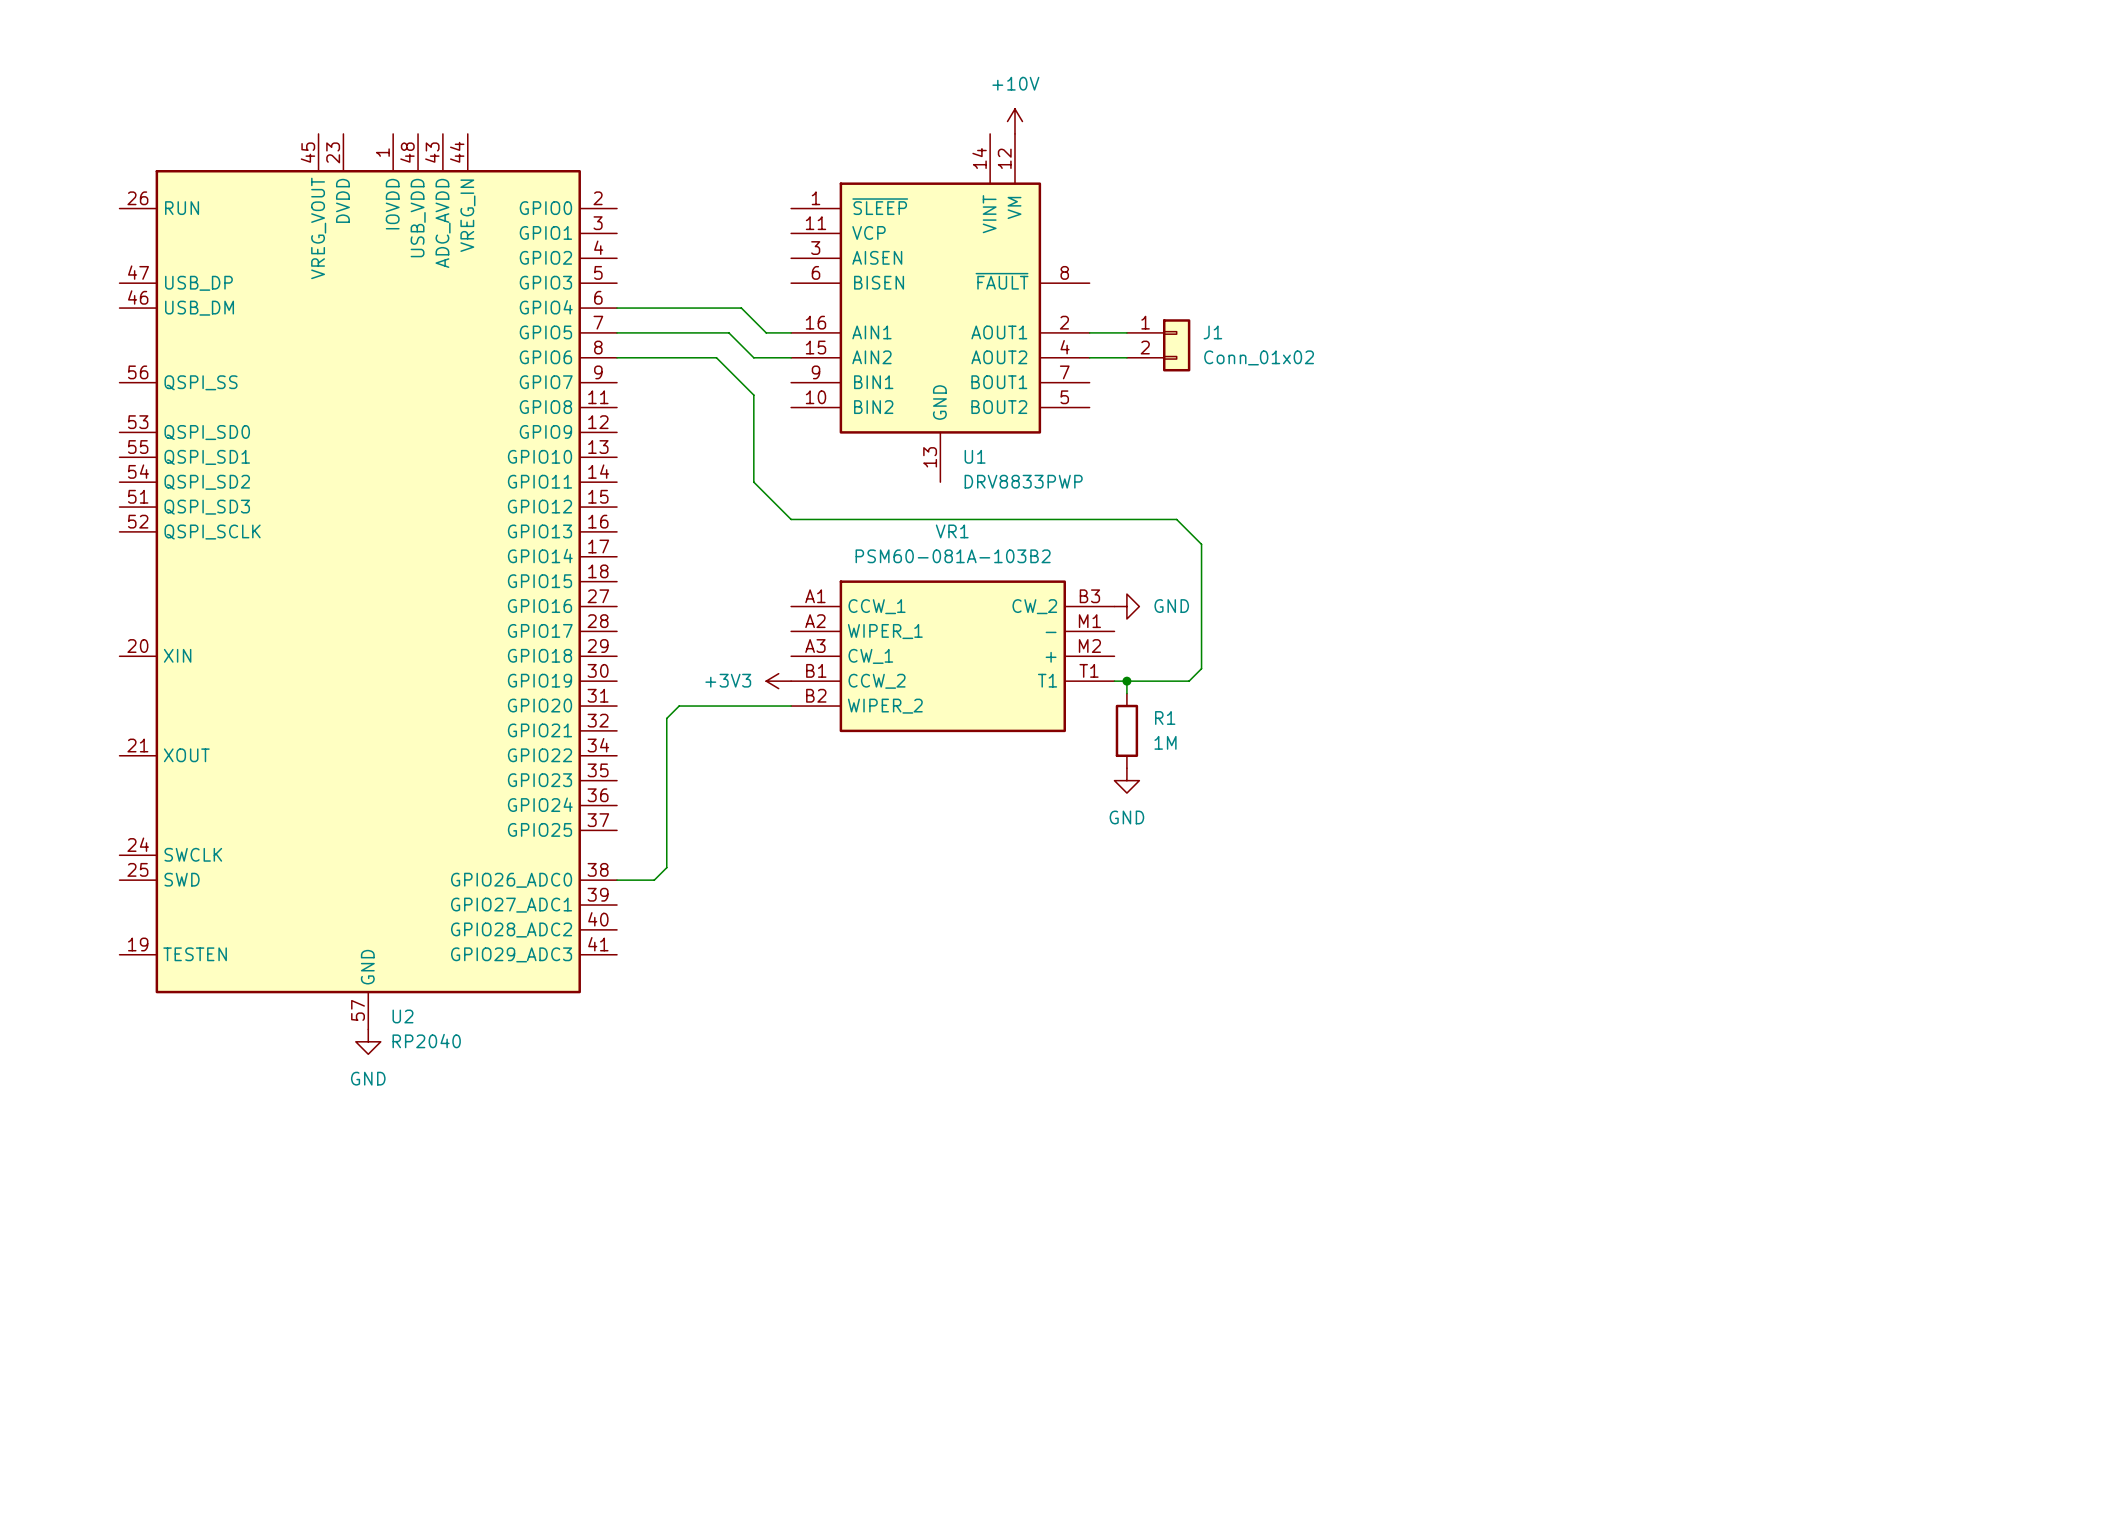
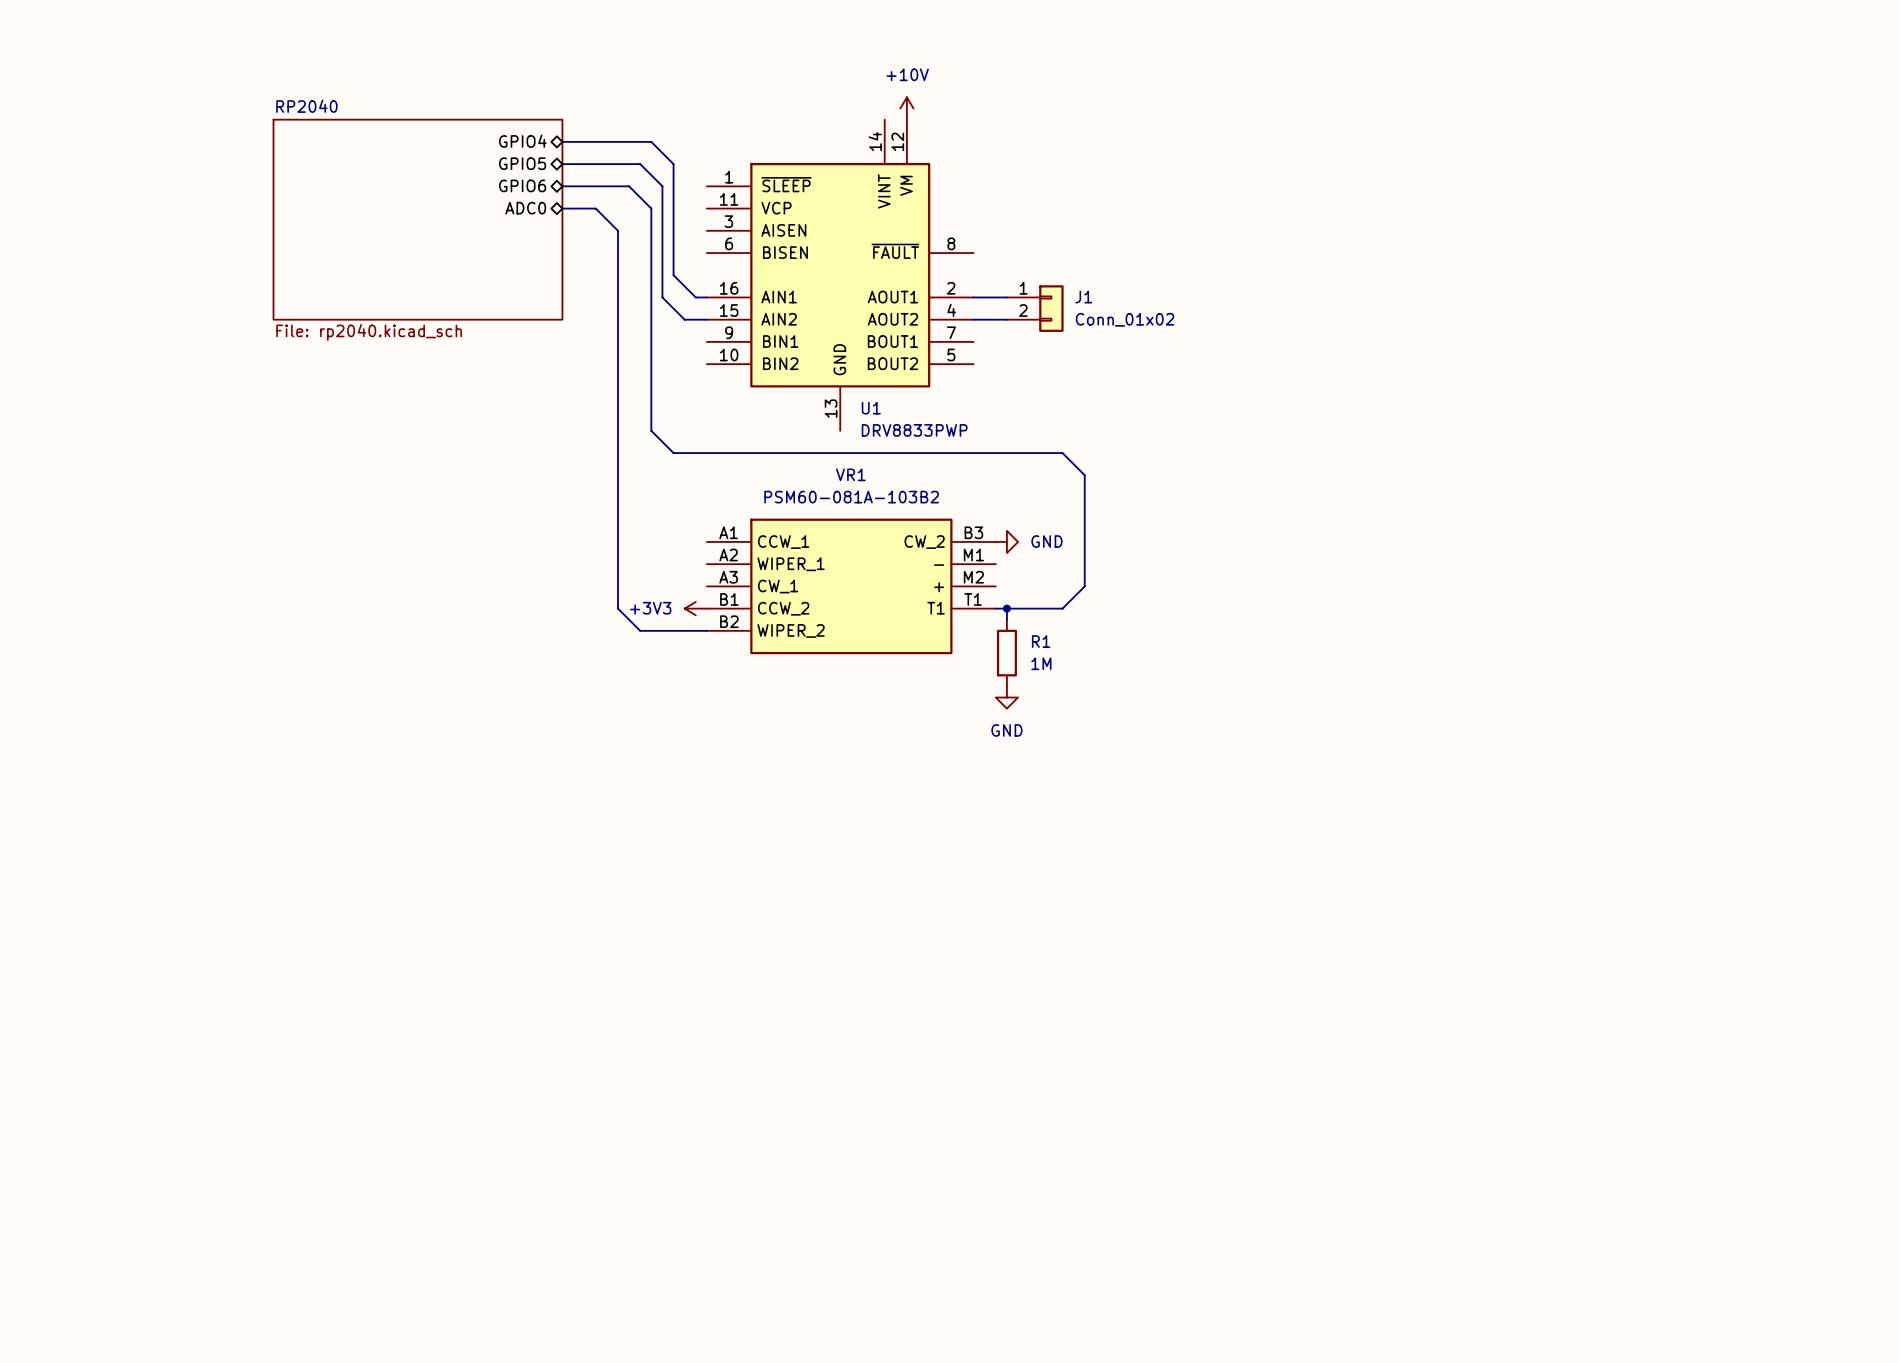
sheet pin: none -> GPIO4 (522, 141)
sheet pin: none -> GPIO5 (522, 163)
sheet pin: none -> GPIO6 (522, 185)
sheet pin: none -> ADC0 (525, 208)
sheet RP2040: none -> File: rp2040.kicad_sch (417, 219)
wire: (617, 308) (741, 308) (766, 332) (778, 332) -> (562, 141) (651, 141) (673, 164) (673, 275) (695, 297)
wire: (617, 332) (728, 332) (753, 357) (766, 357) -> (562, 164) (640, 164) (662, 186) (662, 297) (684, 319)
wire: (617, 357) (716, 357) (753, 395) (753, 482) (791, 519) (1176, 519) (1201, 544) (1201, 668) -> (562, 186) (629, 186) (651, 208) (651, 430) (673, 453) (1062, 453) (1084, 475) (1084, 586) (1073, 597)
U2: RP2040 (368, 581) -> none
wire: (716, 706) (679, 706) (666, 718) (666, 867) (654, 880) (617, 880) -> (640, 630) (618, 608) (618, 230) (595, 208) (562, 208)
power symbol: GND (368, 1041) -> none

